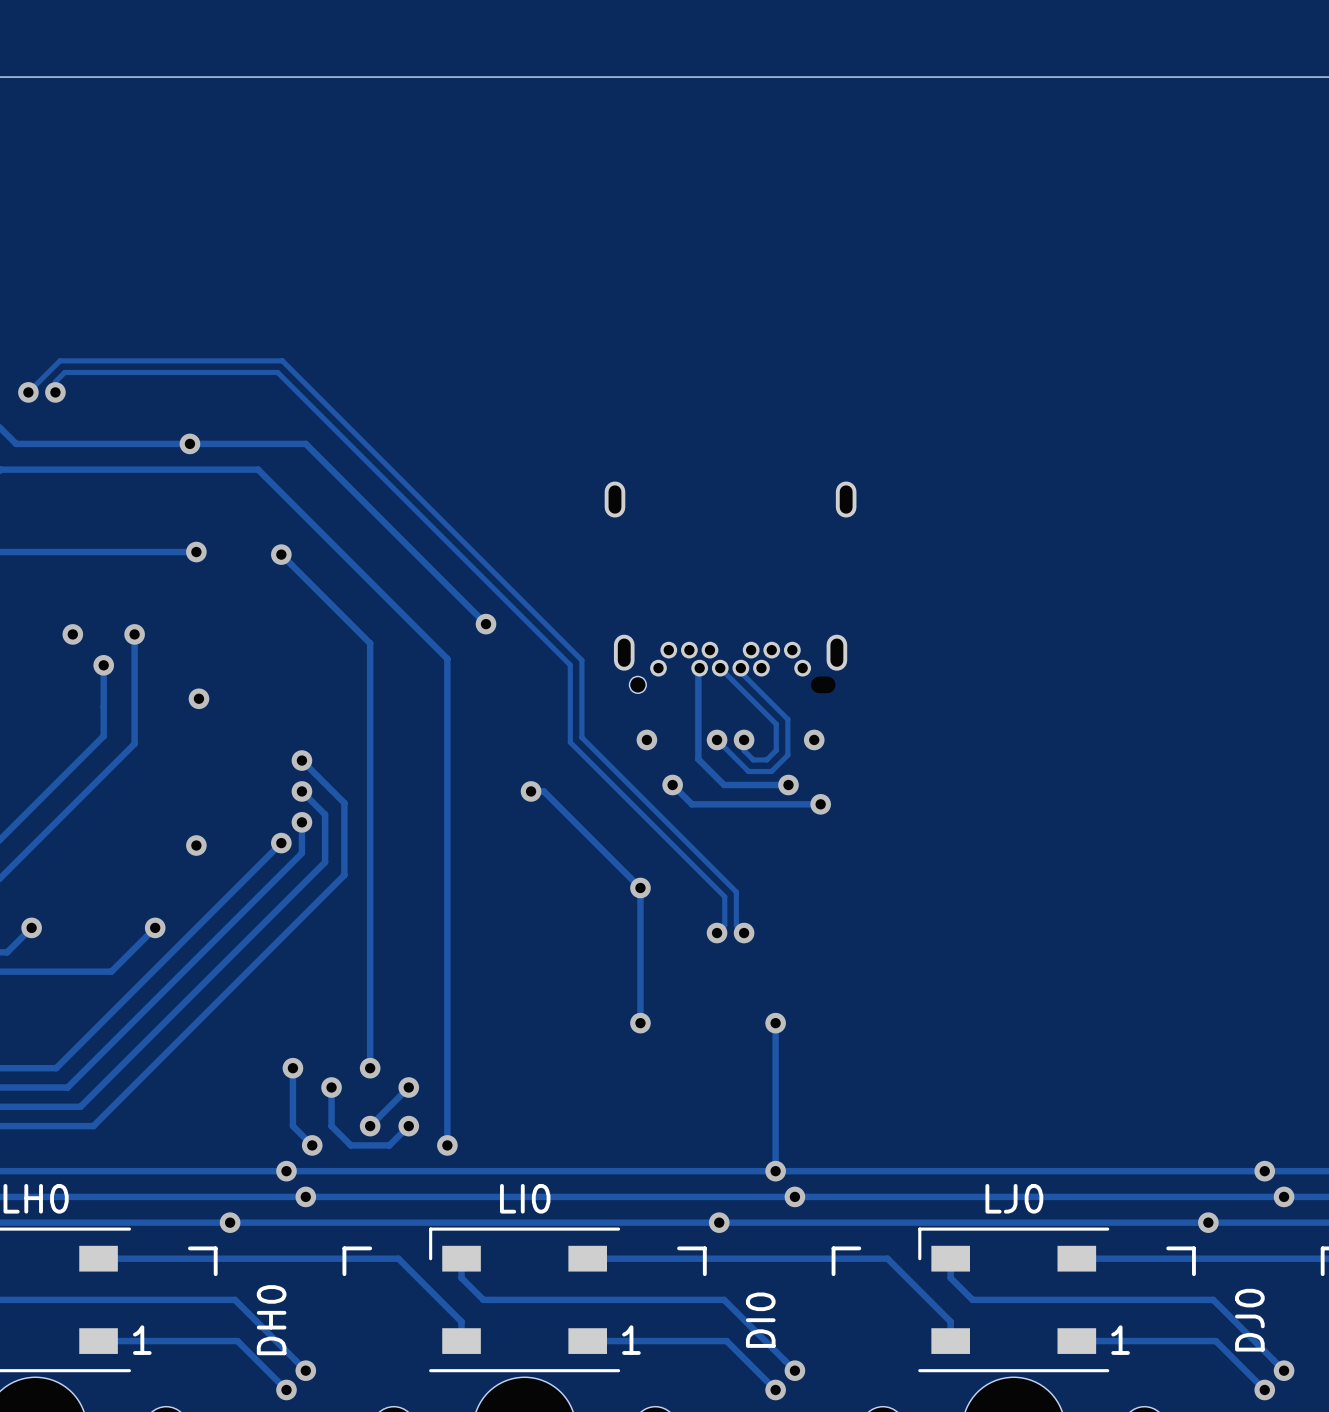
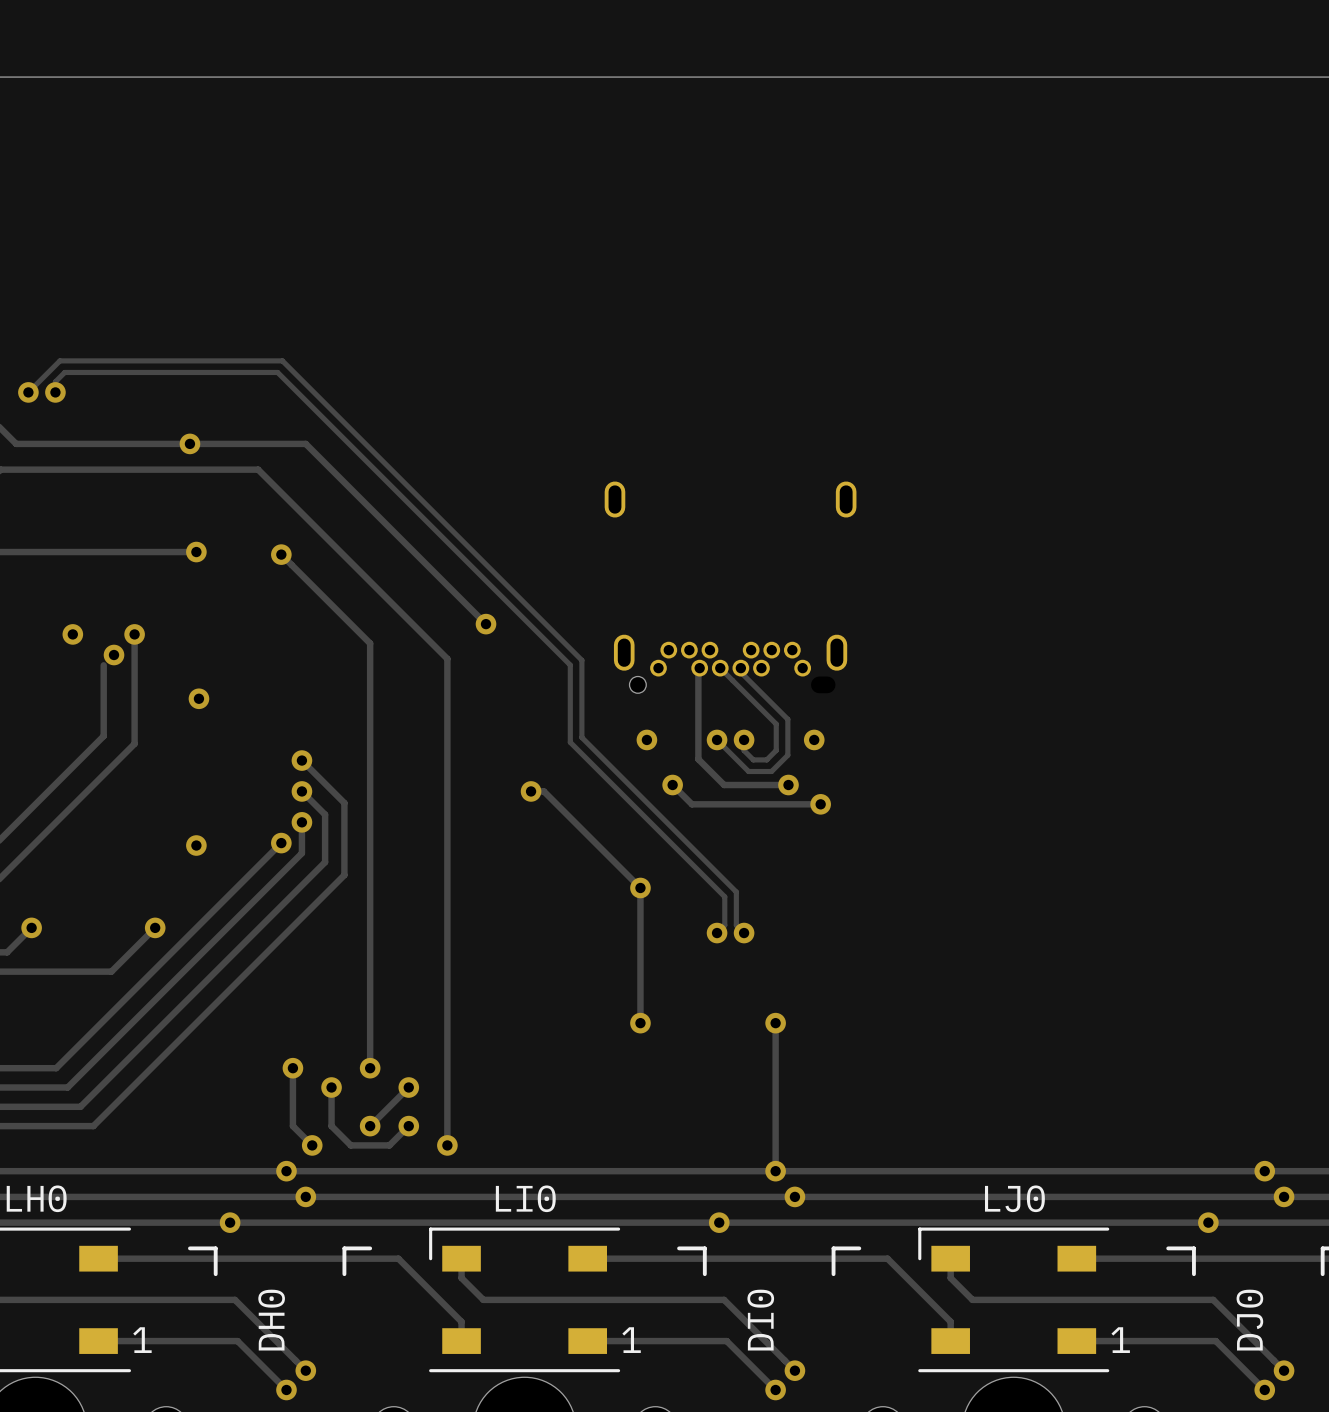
via position: (103, 665) -> (114, 655)

